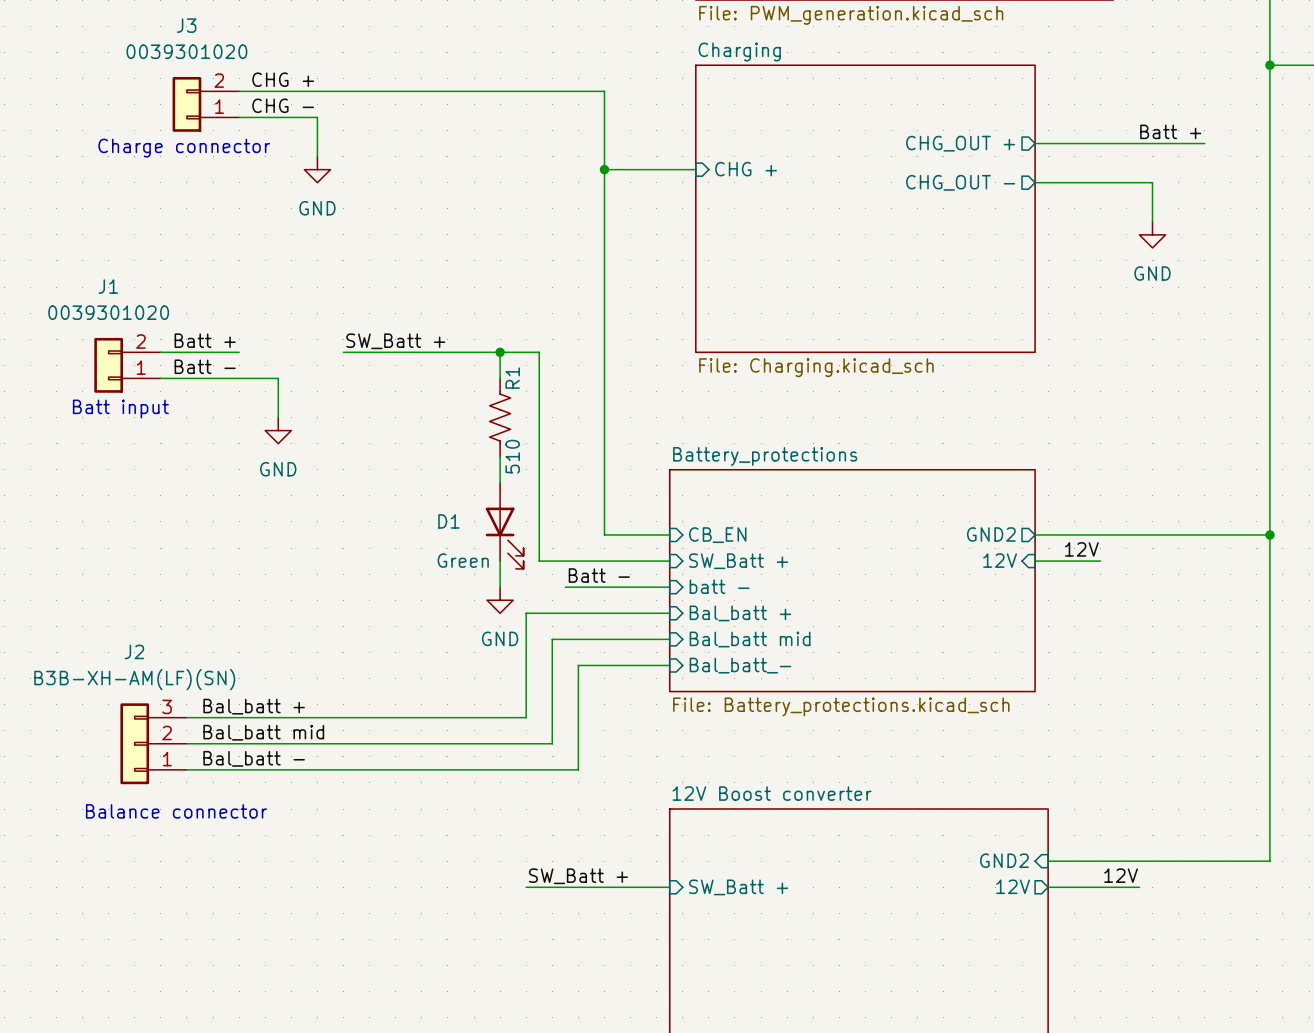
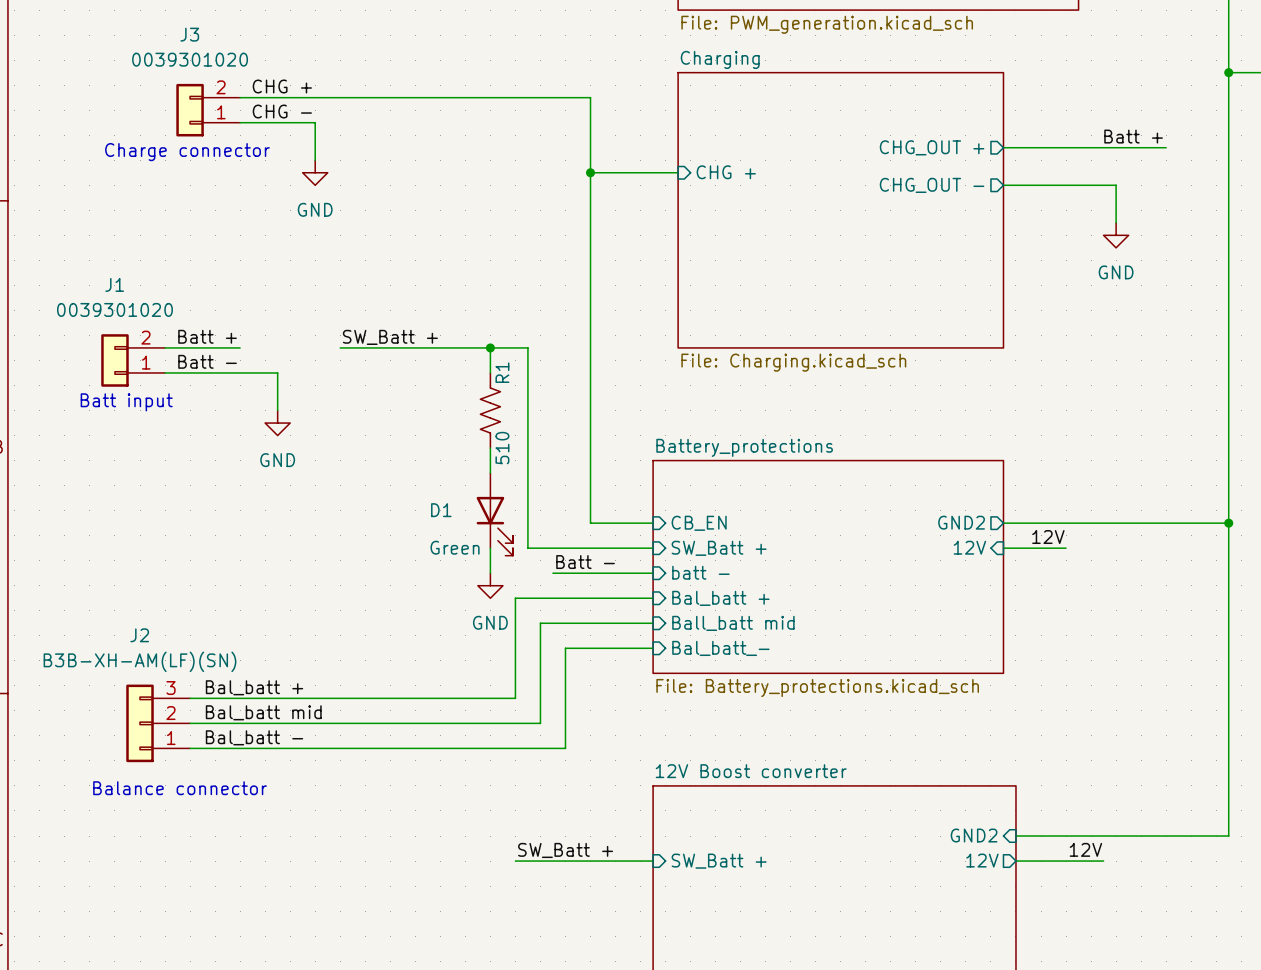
sheet pin: Bal_batt mid (750, 639) -> Ball_batt mid (733, 623)

